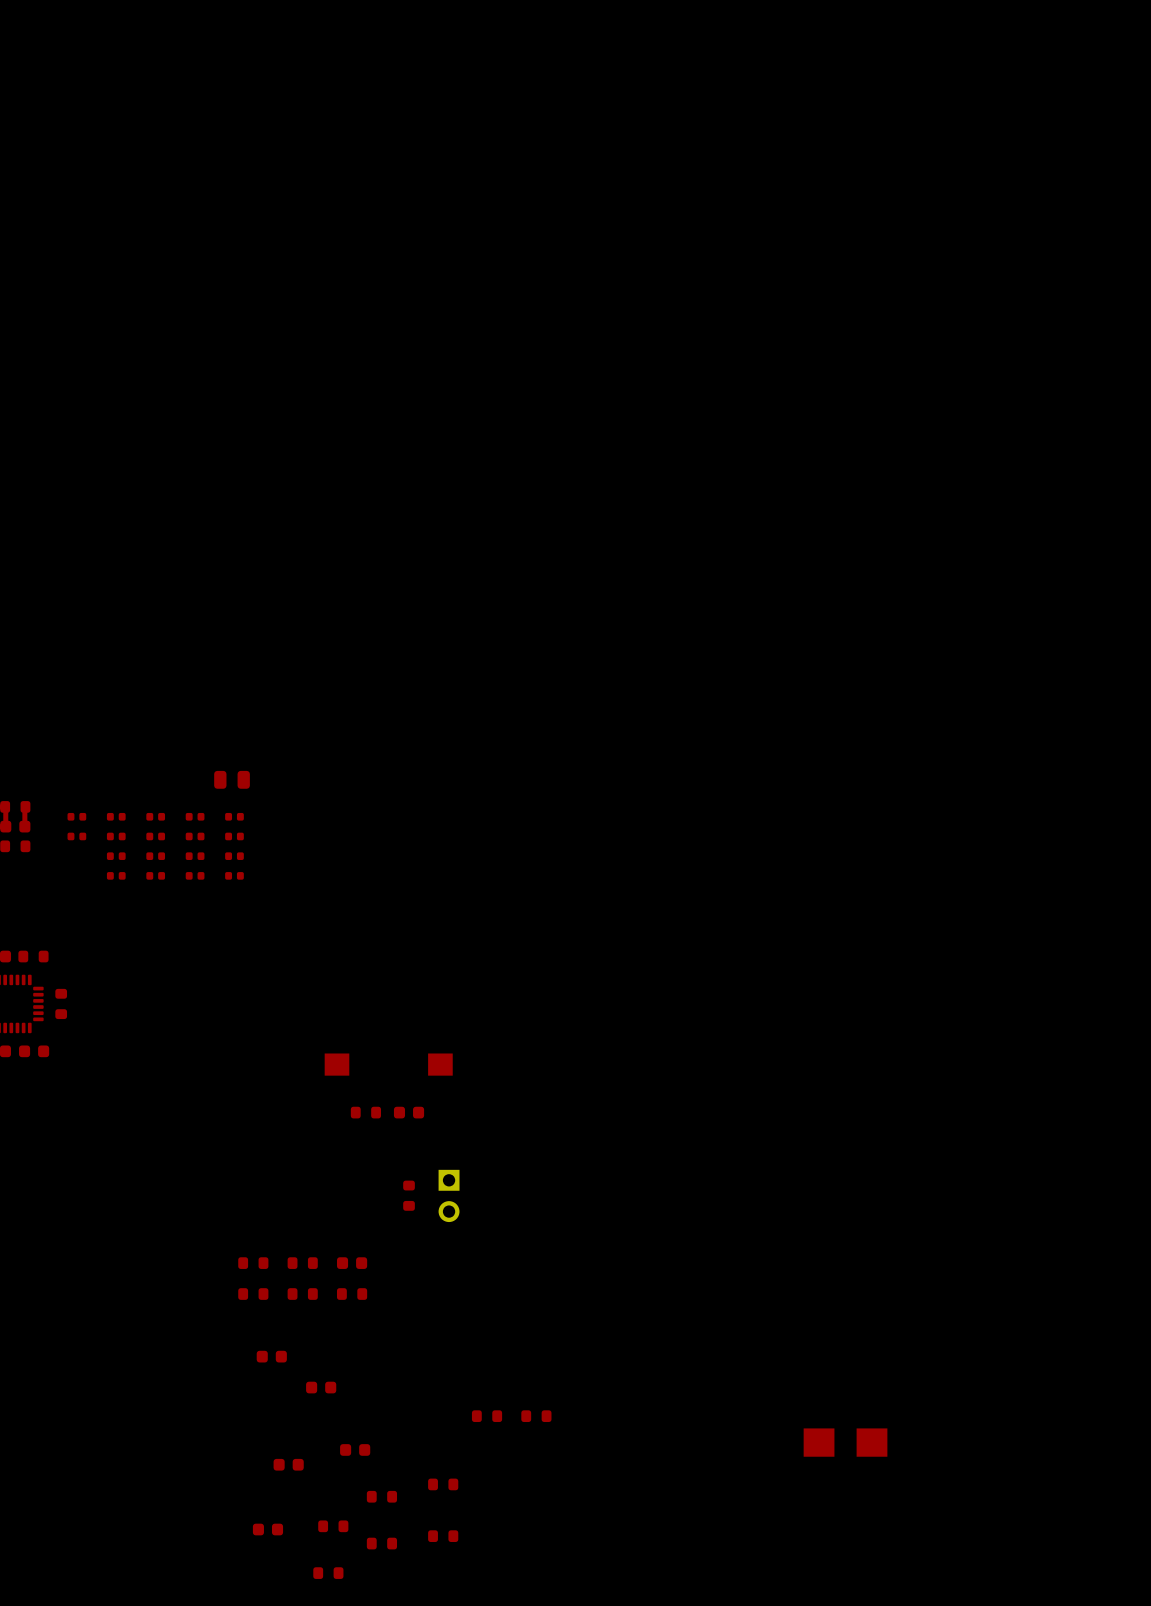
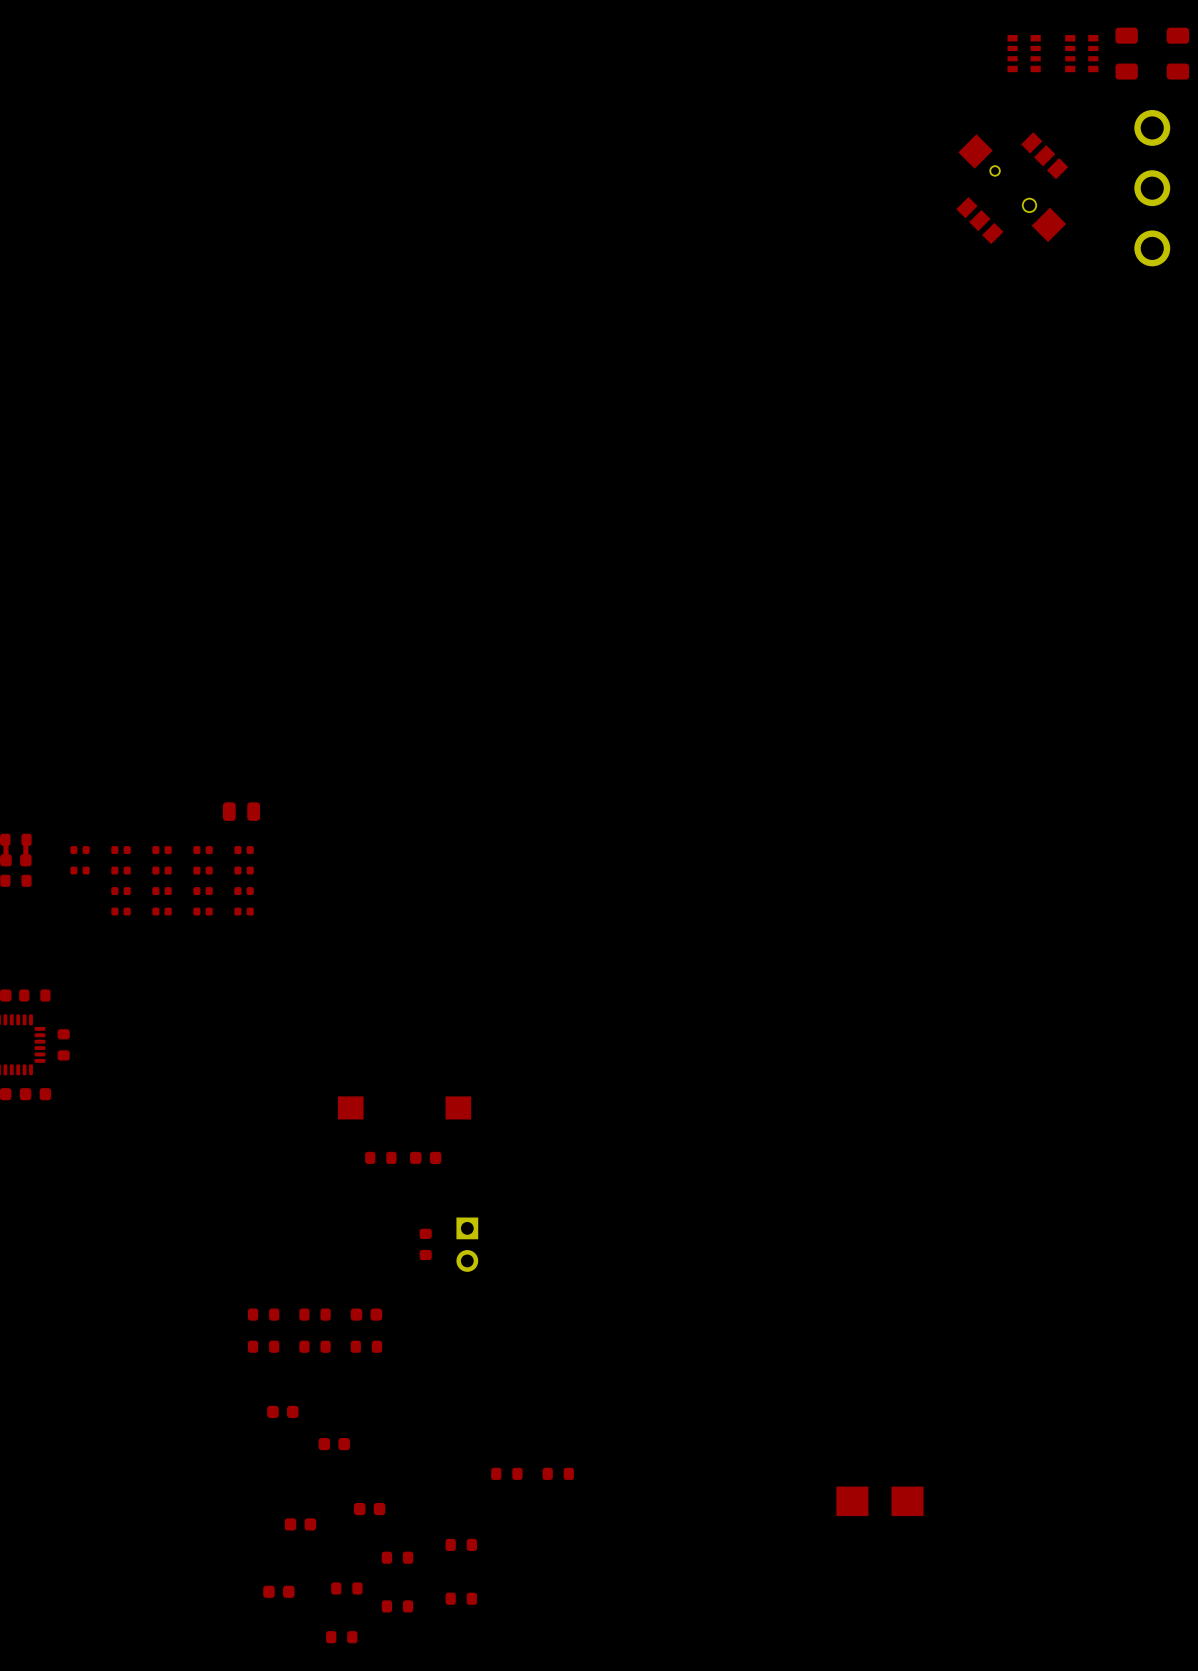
part: none -> (1024, 53)
part: none -> (1081, 53)
part: none -> (1126, 53)
part: none -> (1177, 53)
part: none -> (1012, 188)
part: none -> (1152, 188)

